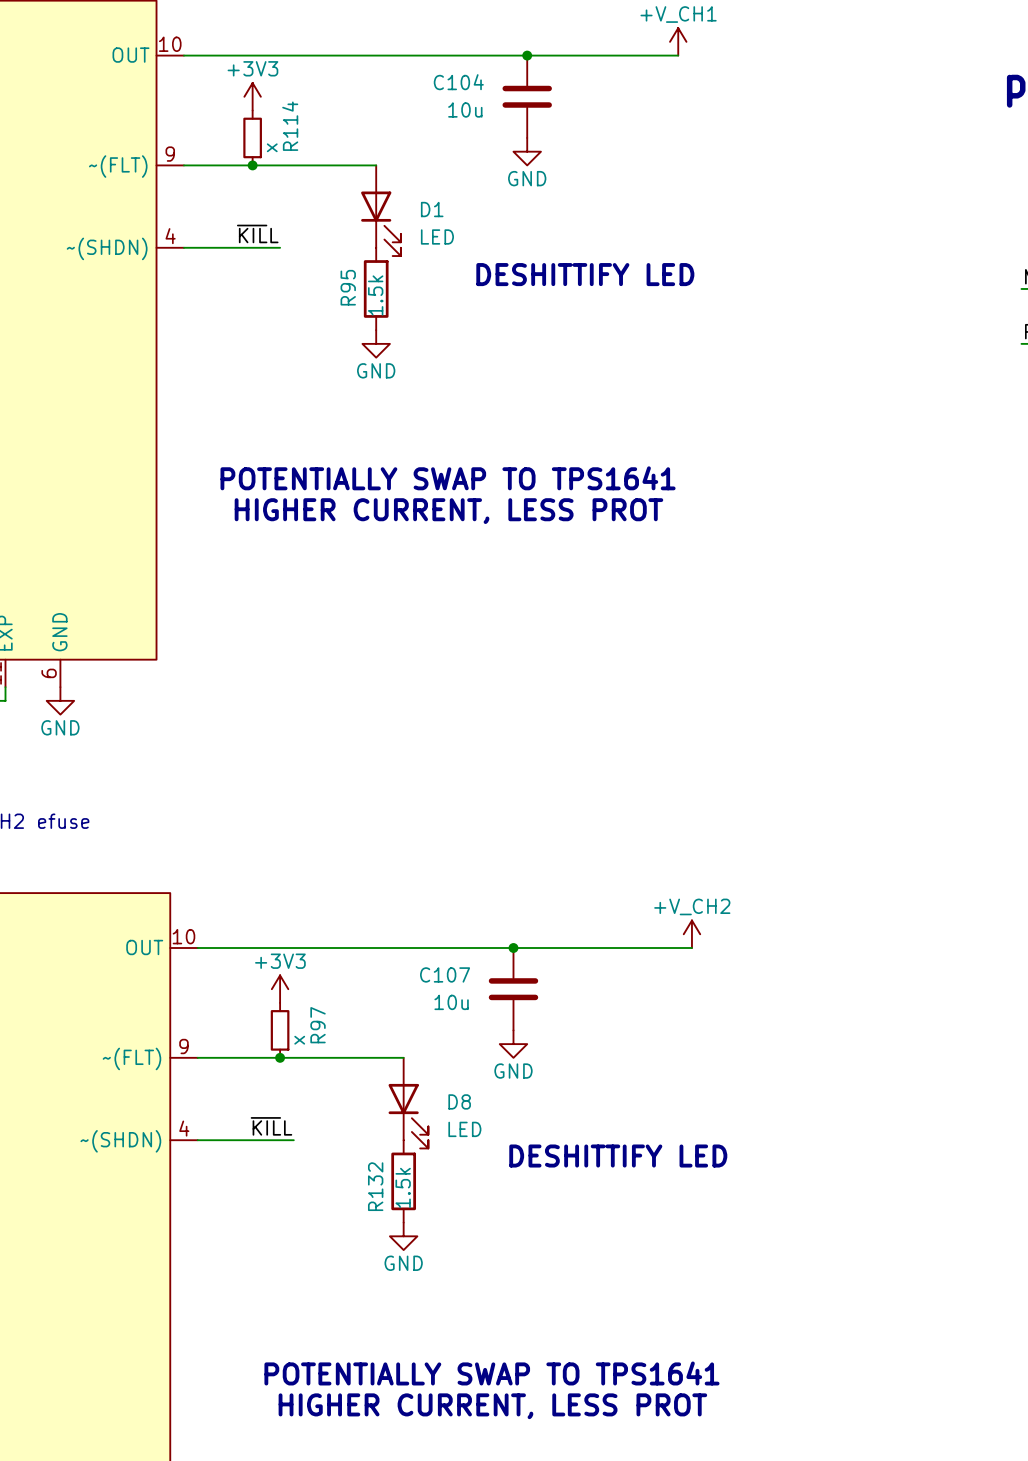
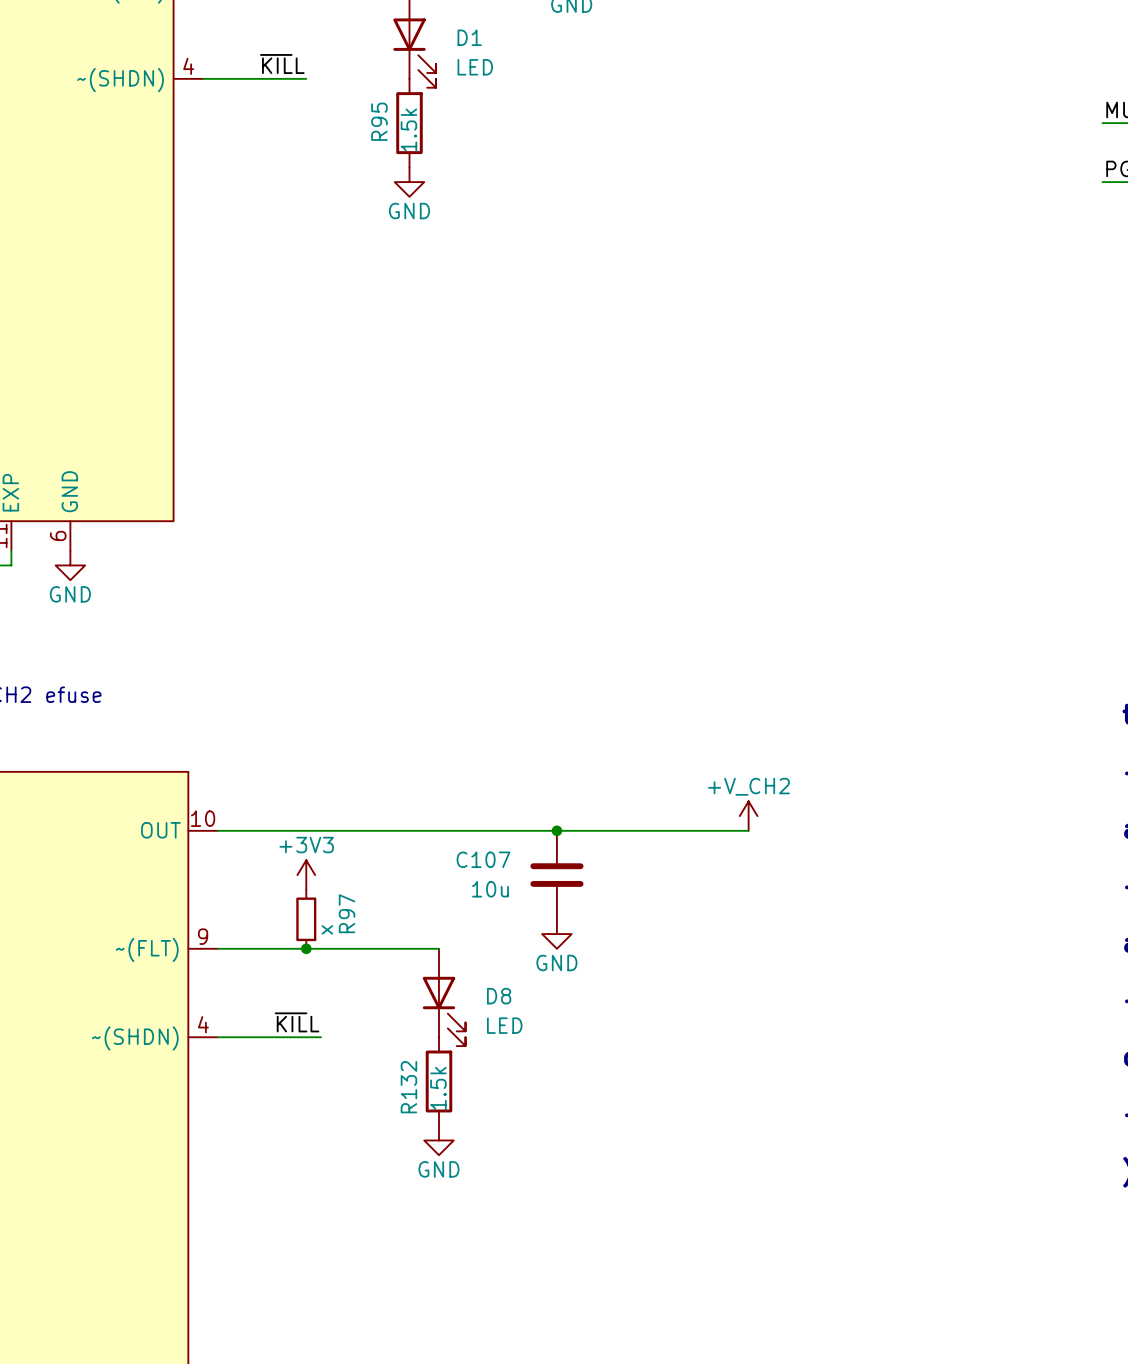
text: DESHITTIFY LED (585, 274) -> none
text: POTENTIALLY SWAP TO TPS1641 (448, 478) -> none
text: HIGHER CURRENT, LESS PROT (448, 511) -> none
text: DESHITTIFY LED (618, 1156) -> none
text: POTENTIALLY SWAP TO TPS1641 (491, 1373) -> none
text: HIGHER CURRENT, LESS PROT (492, 1406) -> none

